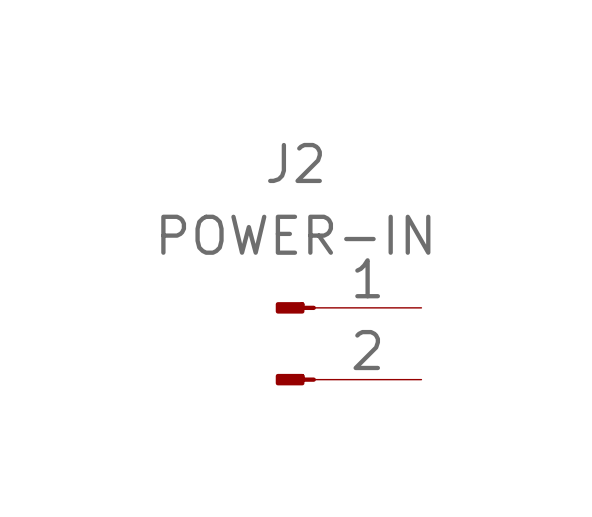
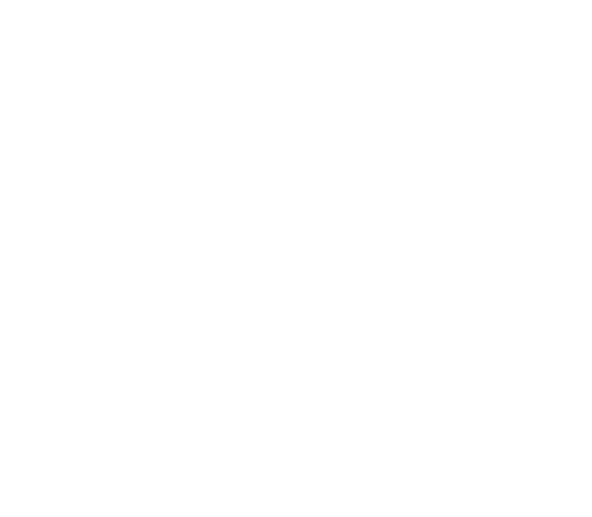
J2: POWER-IN (348, 343) -> none

